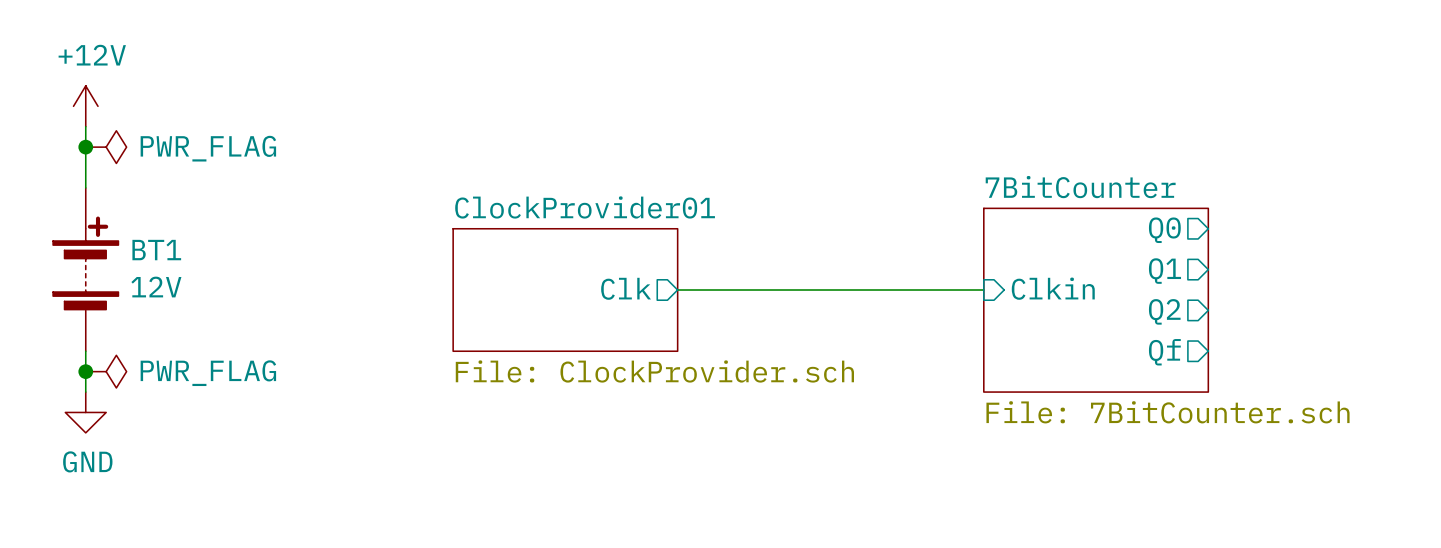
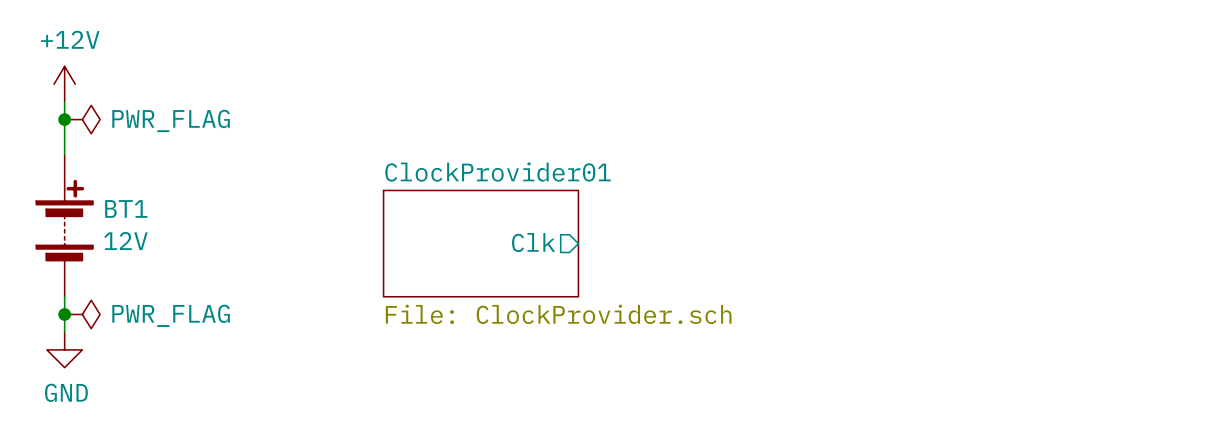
sheet pin: Q0 (1164, 230) -> none
sheet pin: Q1 (1164, 271) -> none
sheet pin: Clkin (1053, 288) -> none
wire: (677, 290) (983, 290) -> none
sheet 7BitCounter: File: 7BitCounter.sch (1096, 300) -> none
sheet pin: Q2 (1164, 311) -> none
sheet pin: Qf (1164, 352) -> none

